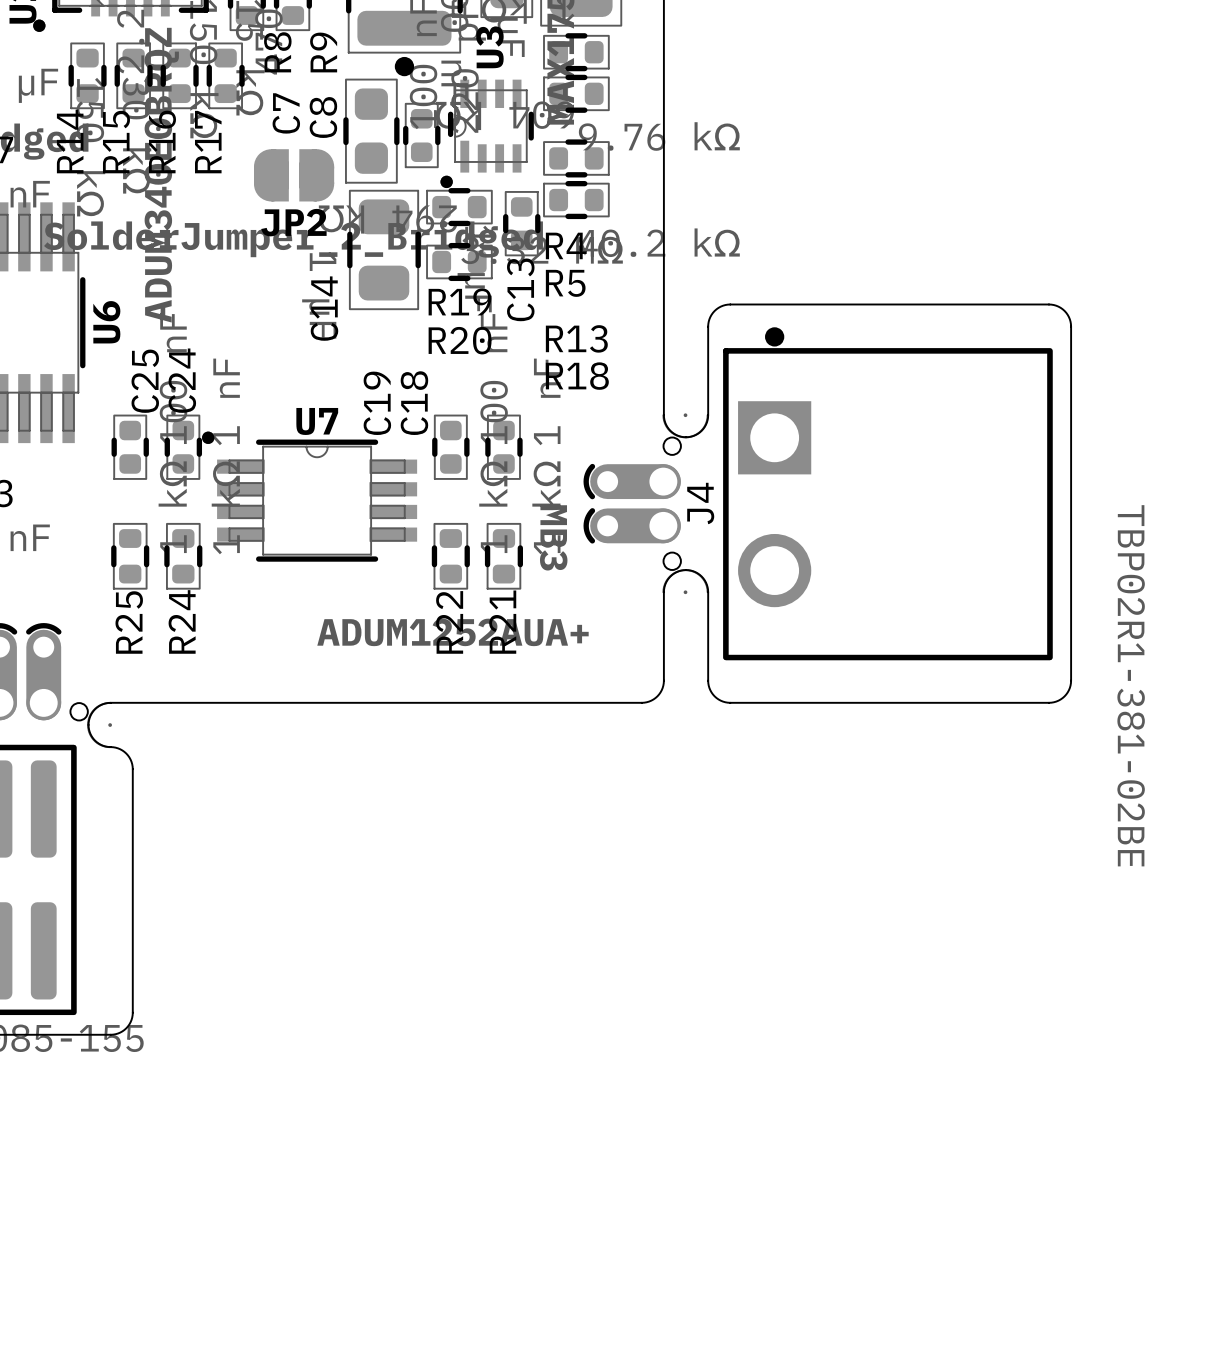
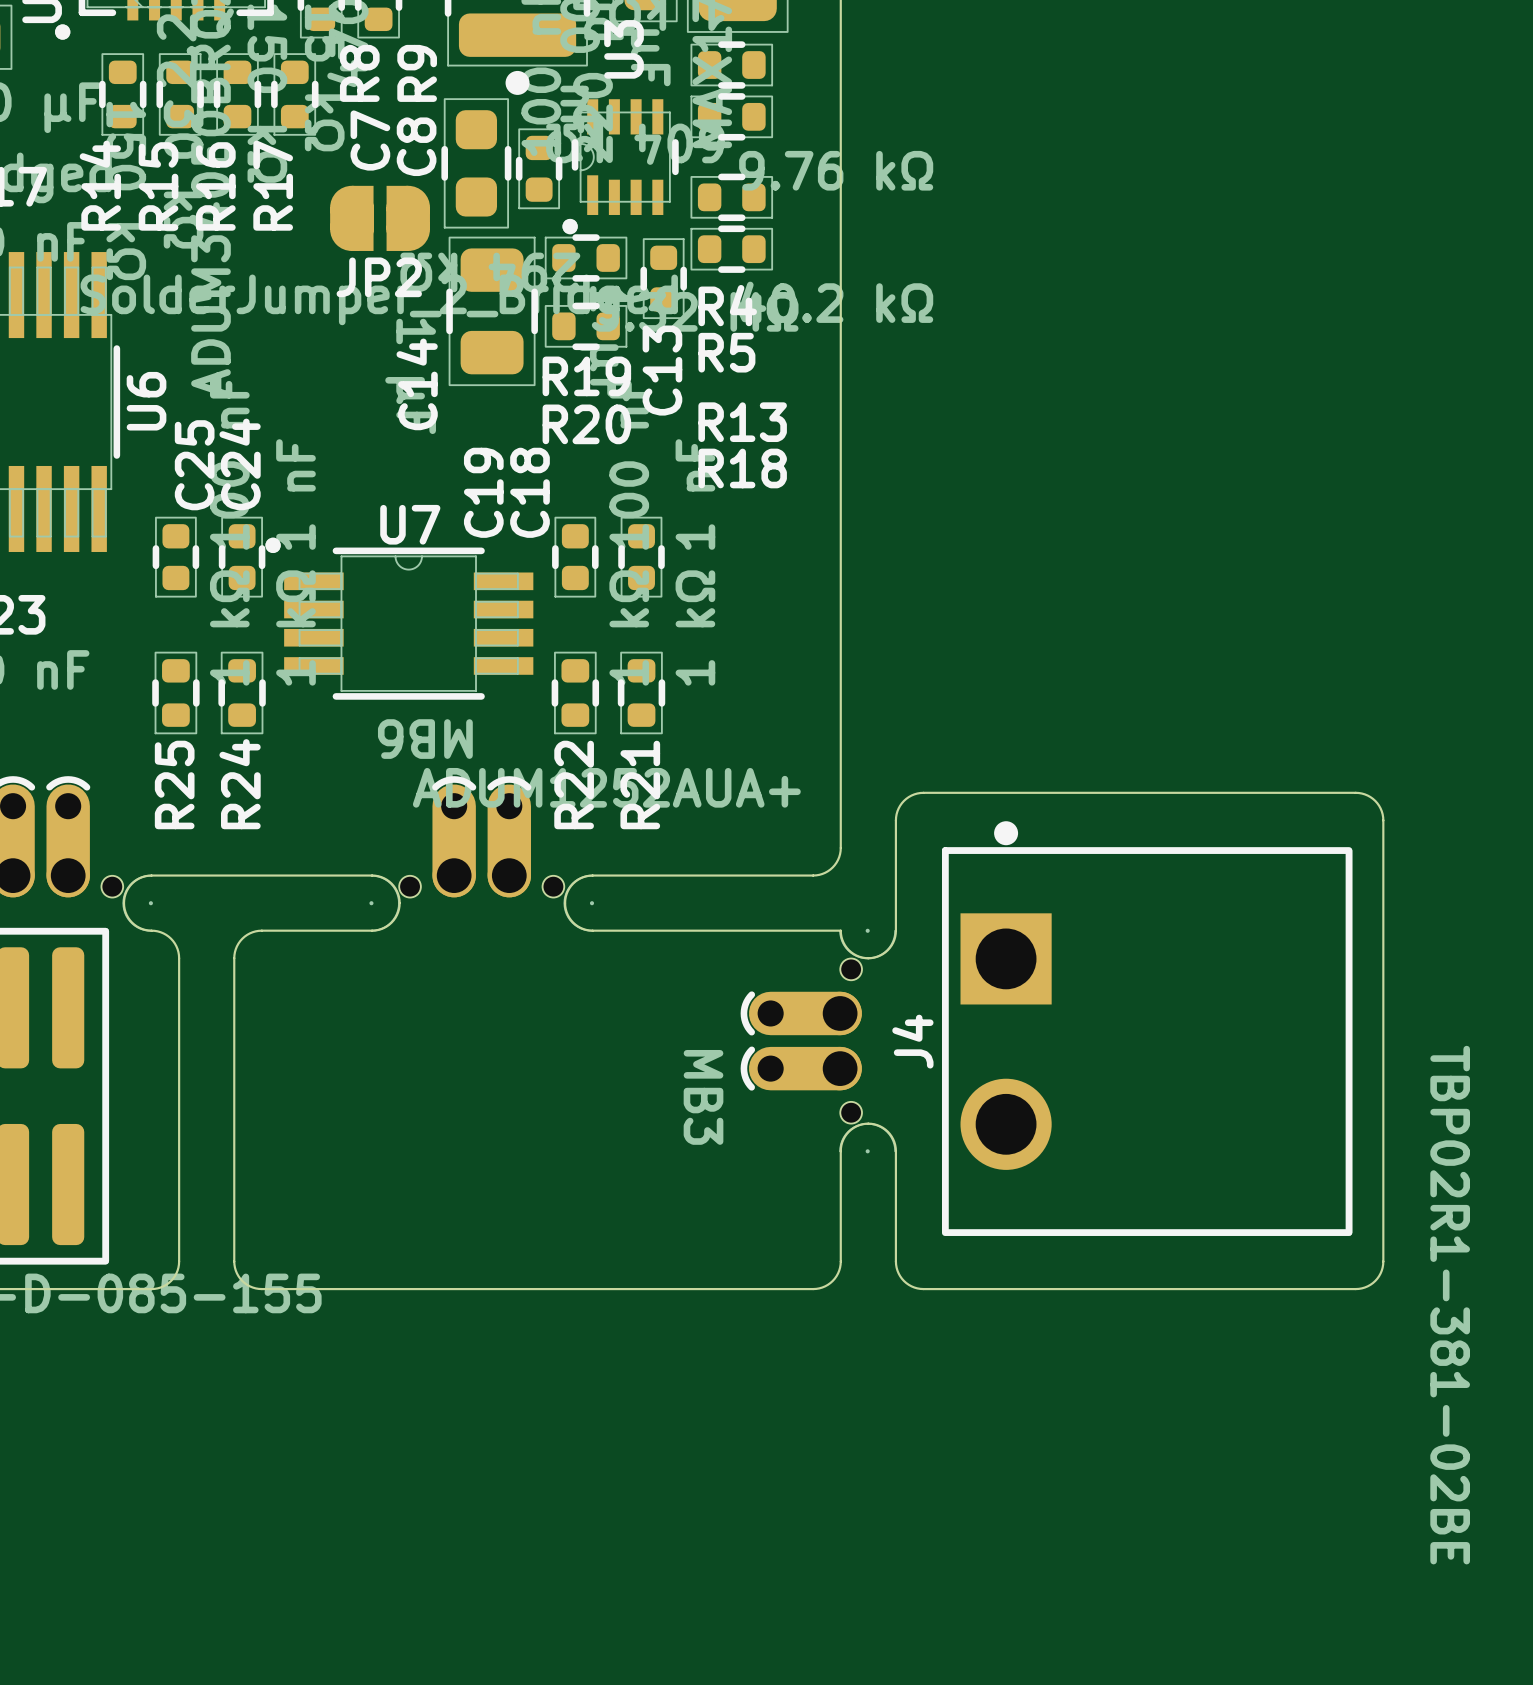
board edge: (663, 415) (667, 426) (678, 436) (693, 436) (704, 426) (708, 415) (708, 324) (714, 310) (725, 305) (1048, 304) (1062, 309) (1070, 321) (1071, 680) (1069, 688) (1064, 696) (1058, 700) (1048, 702) (730, 702) (720, 700) (714, 696) (710, 690) (708, 680) -> (840, 517) (840, 737)
part: (632, 481) -> none
J4 position: (887, 493) -> (1147, 1028)
MB3 position: (685, 503) -> (867, 1041)
part: (632, 525) -> none
board edge: (663, 592) (667, 580) (678, 571) (693, 571) (704, 580) (708, 592) (708, 658) -> none
part: none -> (454, 836)
part: none -> (509, 836)
board edge: none -> (895, 847) (895, 936) (891, 945) (885, 952) (871, 958) (859, 956) (848, 950) (843, 942) (840, 930) (583, 929) (575, 924) (569, 917) (565, 909) (565, 896) (569, 888) (575, 881) (583, 877) (592, 875)
board edge: (287, 702) (464, 702) -> (372, 875) (381, 877) (389, 881) (395, 888) (398, 896) (399, 906) (396, 915) (391, 922) (384, 927) (372, 930) (258, 930) (244, 936) (235, 949) (234, 958) (234, 1261) (235, 1270) (240, 1278) (252, 1287) (261, 1289) (819, 1288) (827, 1284) (834, 1278) (840, 1264) (842, 1142) (846, 1134) (853, 1127) (868, 1123) (877, 1125) (885, 1129) (891, 1136) (895, 1145) (896, 1264) (901, 1278) (914, 1287) (923, 1289) (1355, 1289) (1364, 1287) (1375, 1280) (1380, 1273) (1383, 1261) (1383, 820) (1381, 811) (1375, 800) (1364, 794) (1355, 792) (923, 792) (914, 794) (903, 800) (898, 808) (895, 820)
MB6: none -> (481, 903)
part: none -> (801, 1013)
part: none -> (801, 1068)

